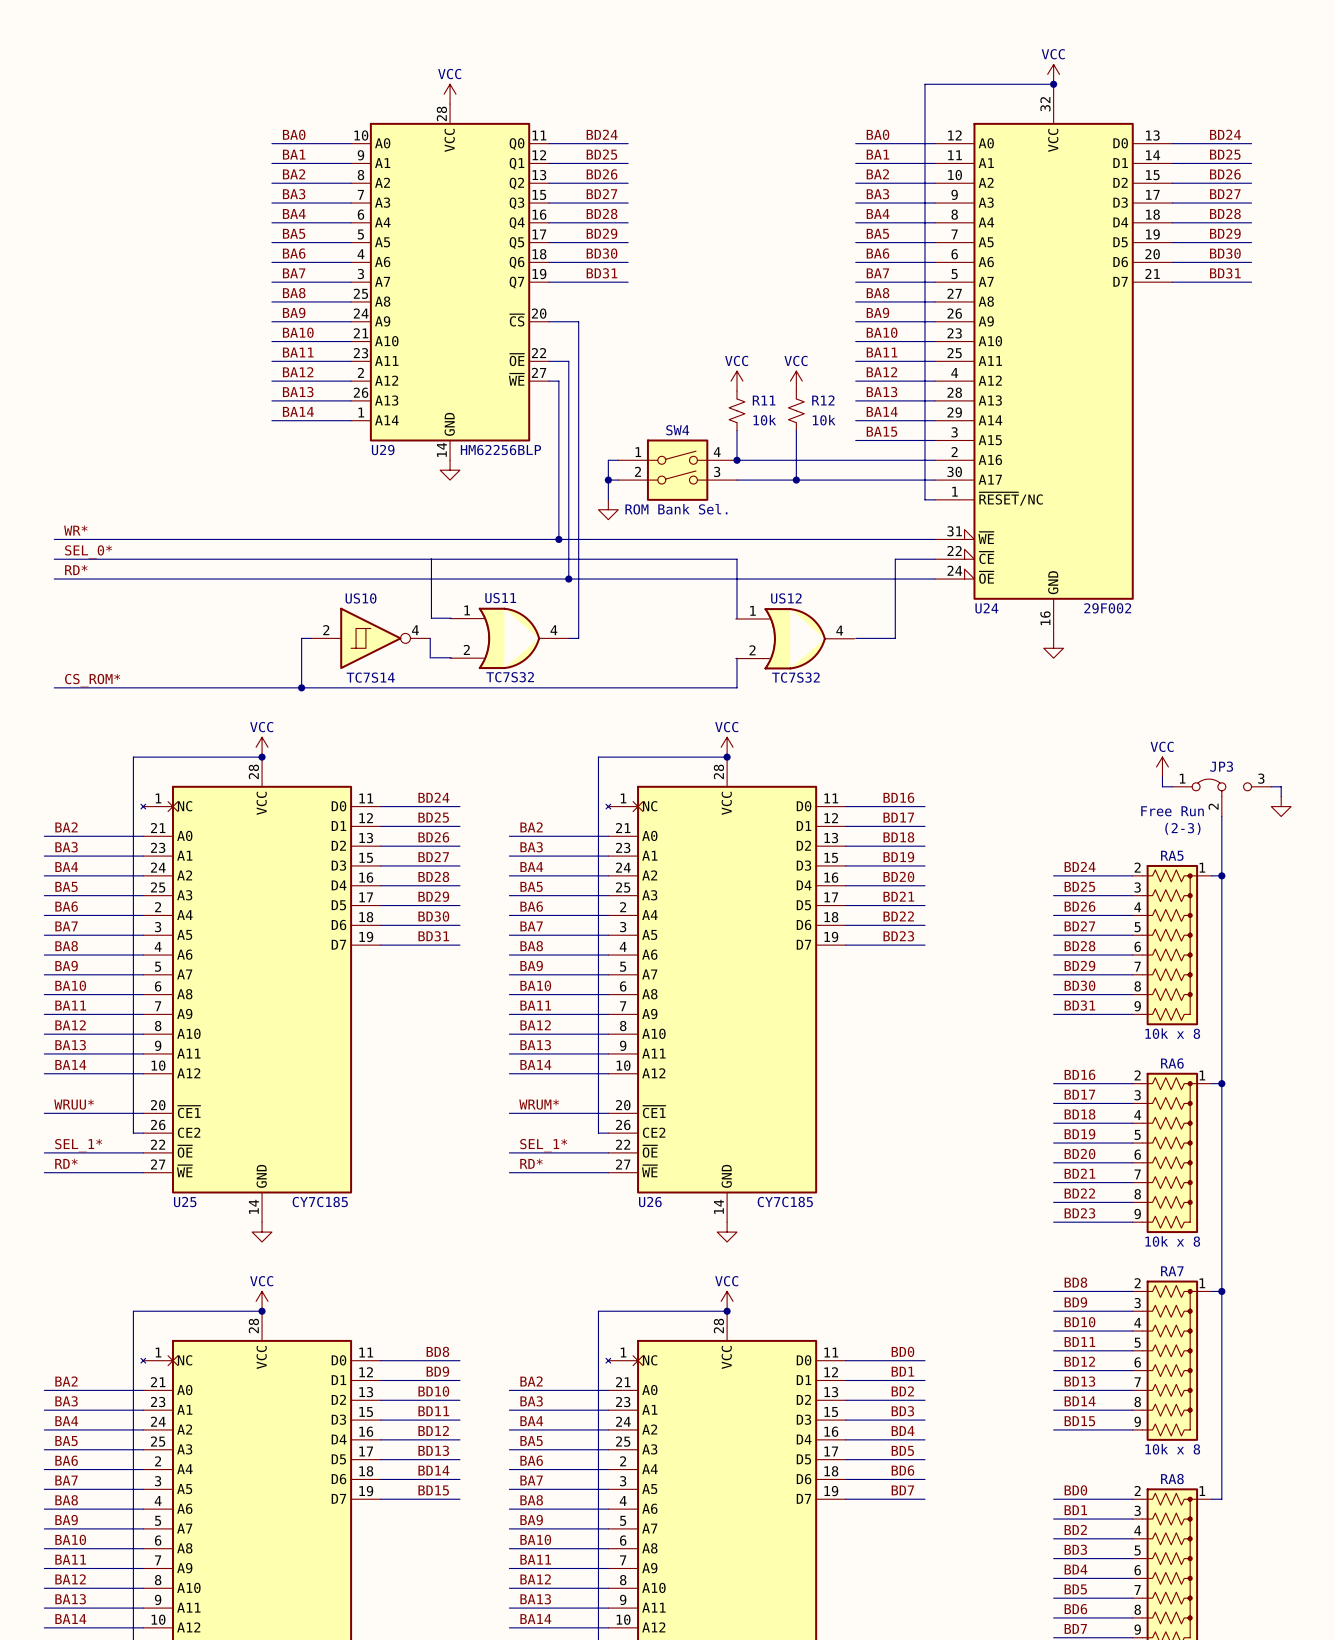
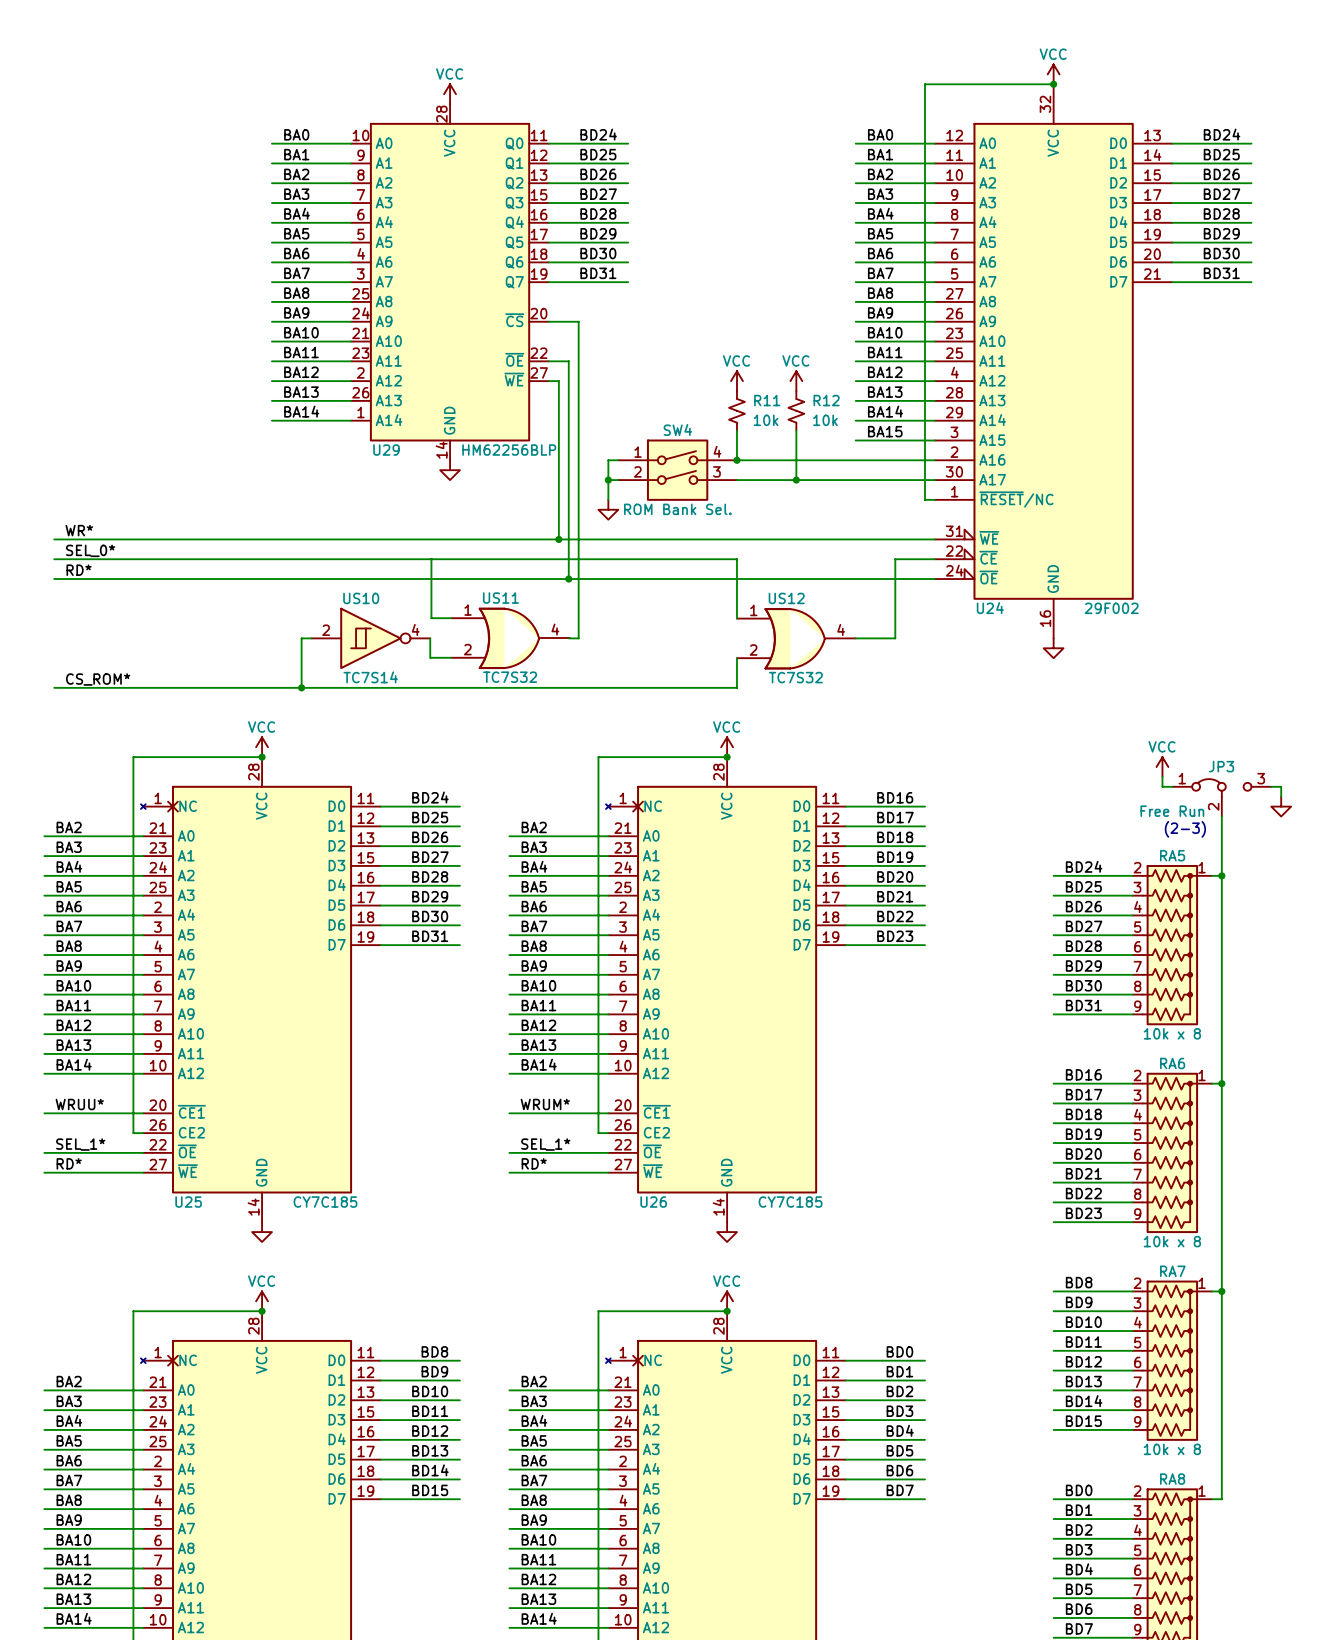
US11 symbol: [450, 607, 569, 670] -> [451, 607, 570, 670]
US12 symbol: [735, 608, 855, 670] -> [736, 608, 856, 670]

